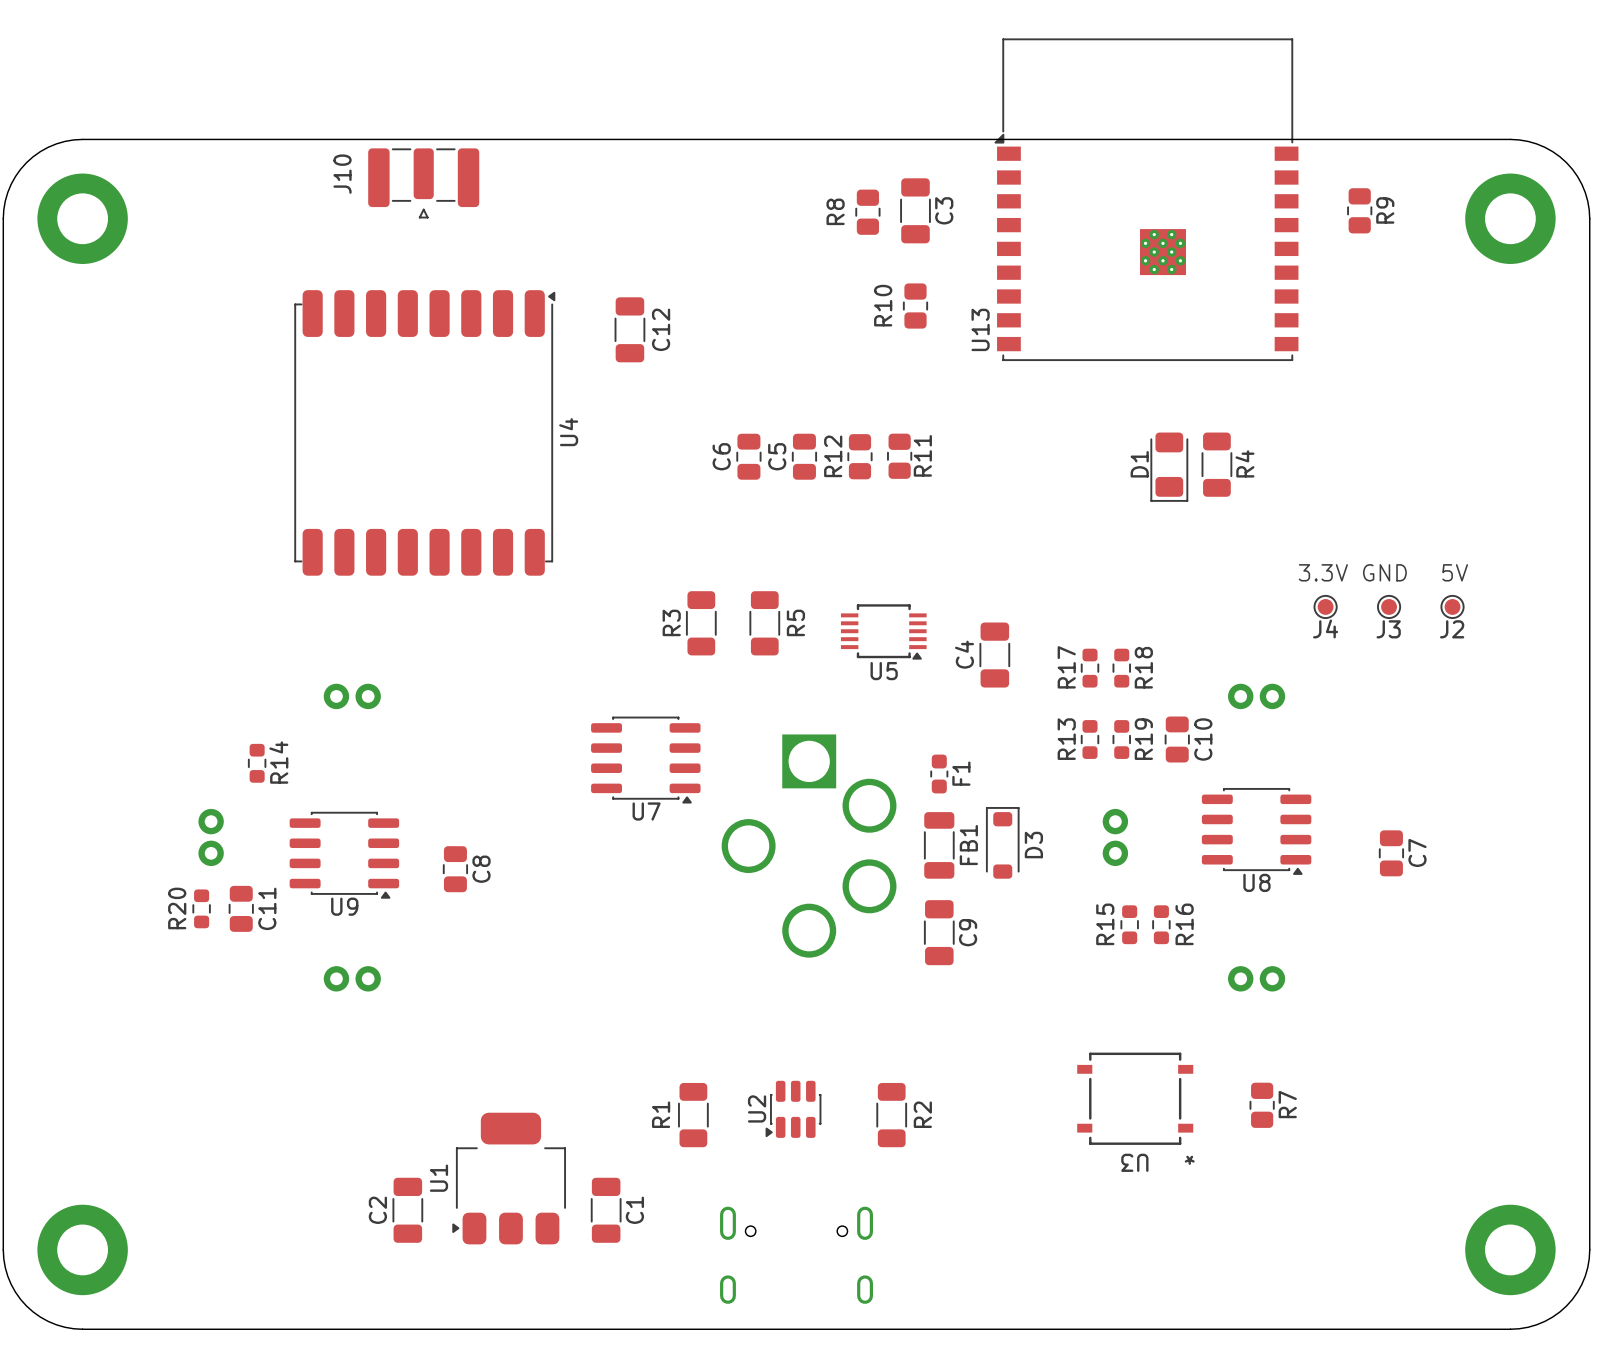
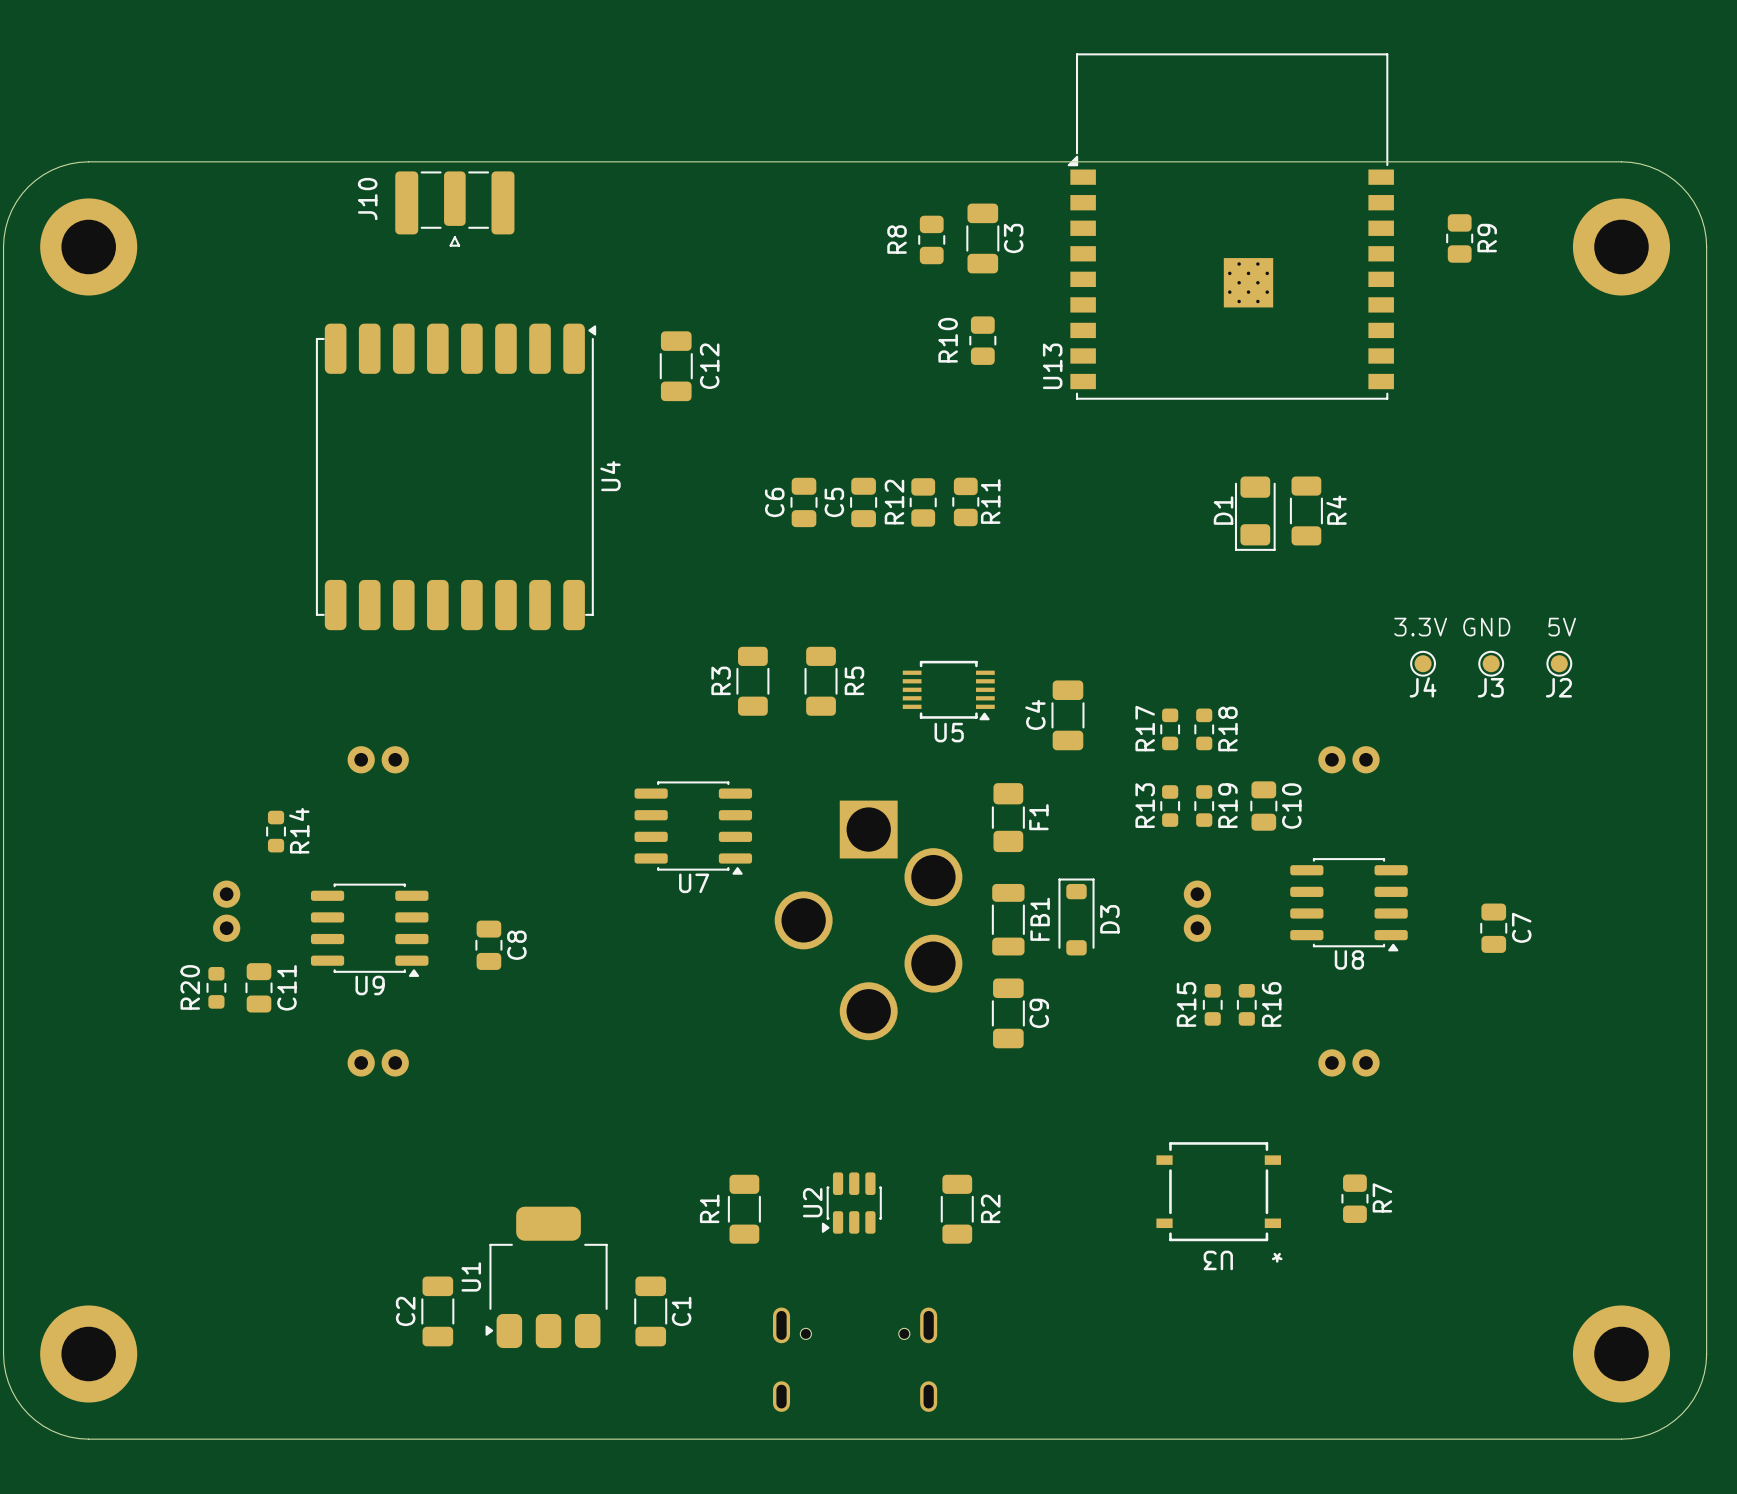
F1 footprint: [930, 754, 949, 794] -> [991, 783, 1025, 853]

